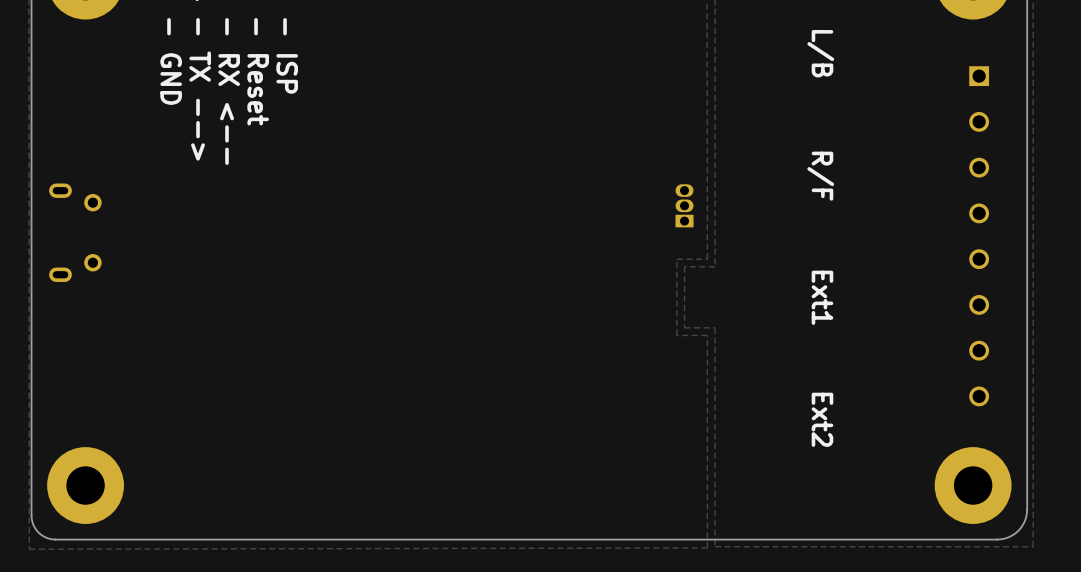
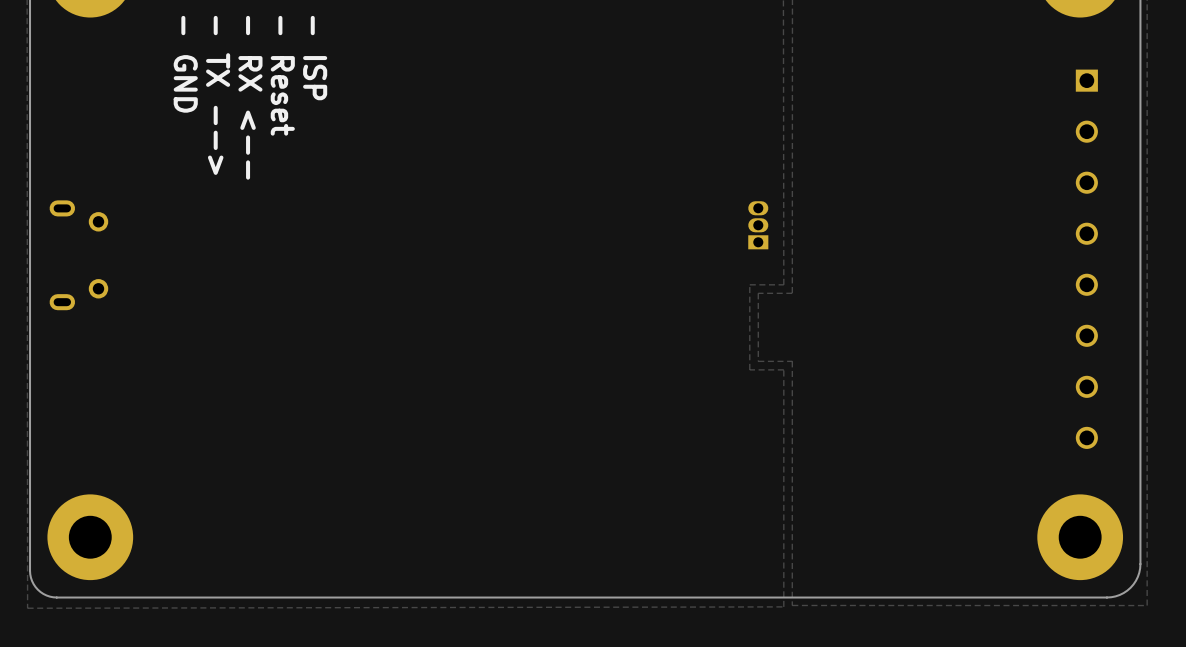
text: L/B (820, 53) -> none
text: R/F (820, 176) -> none
text: Ext1 (822, 297) -> none
text: Ext2 (822, 419) -> none

